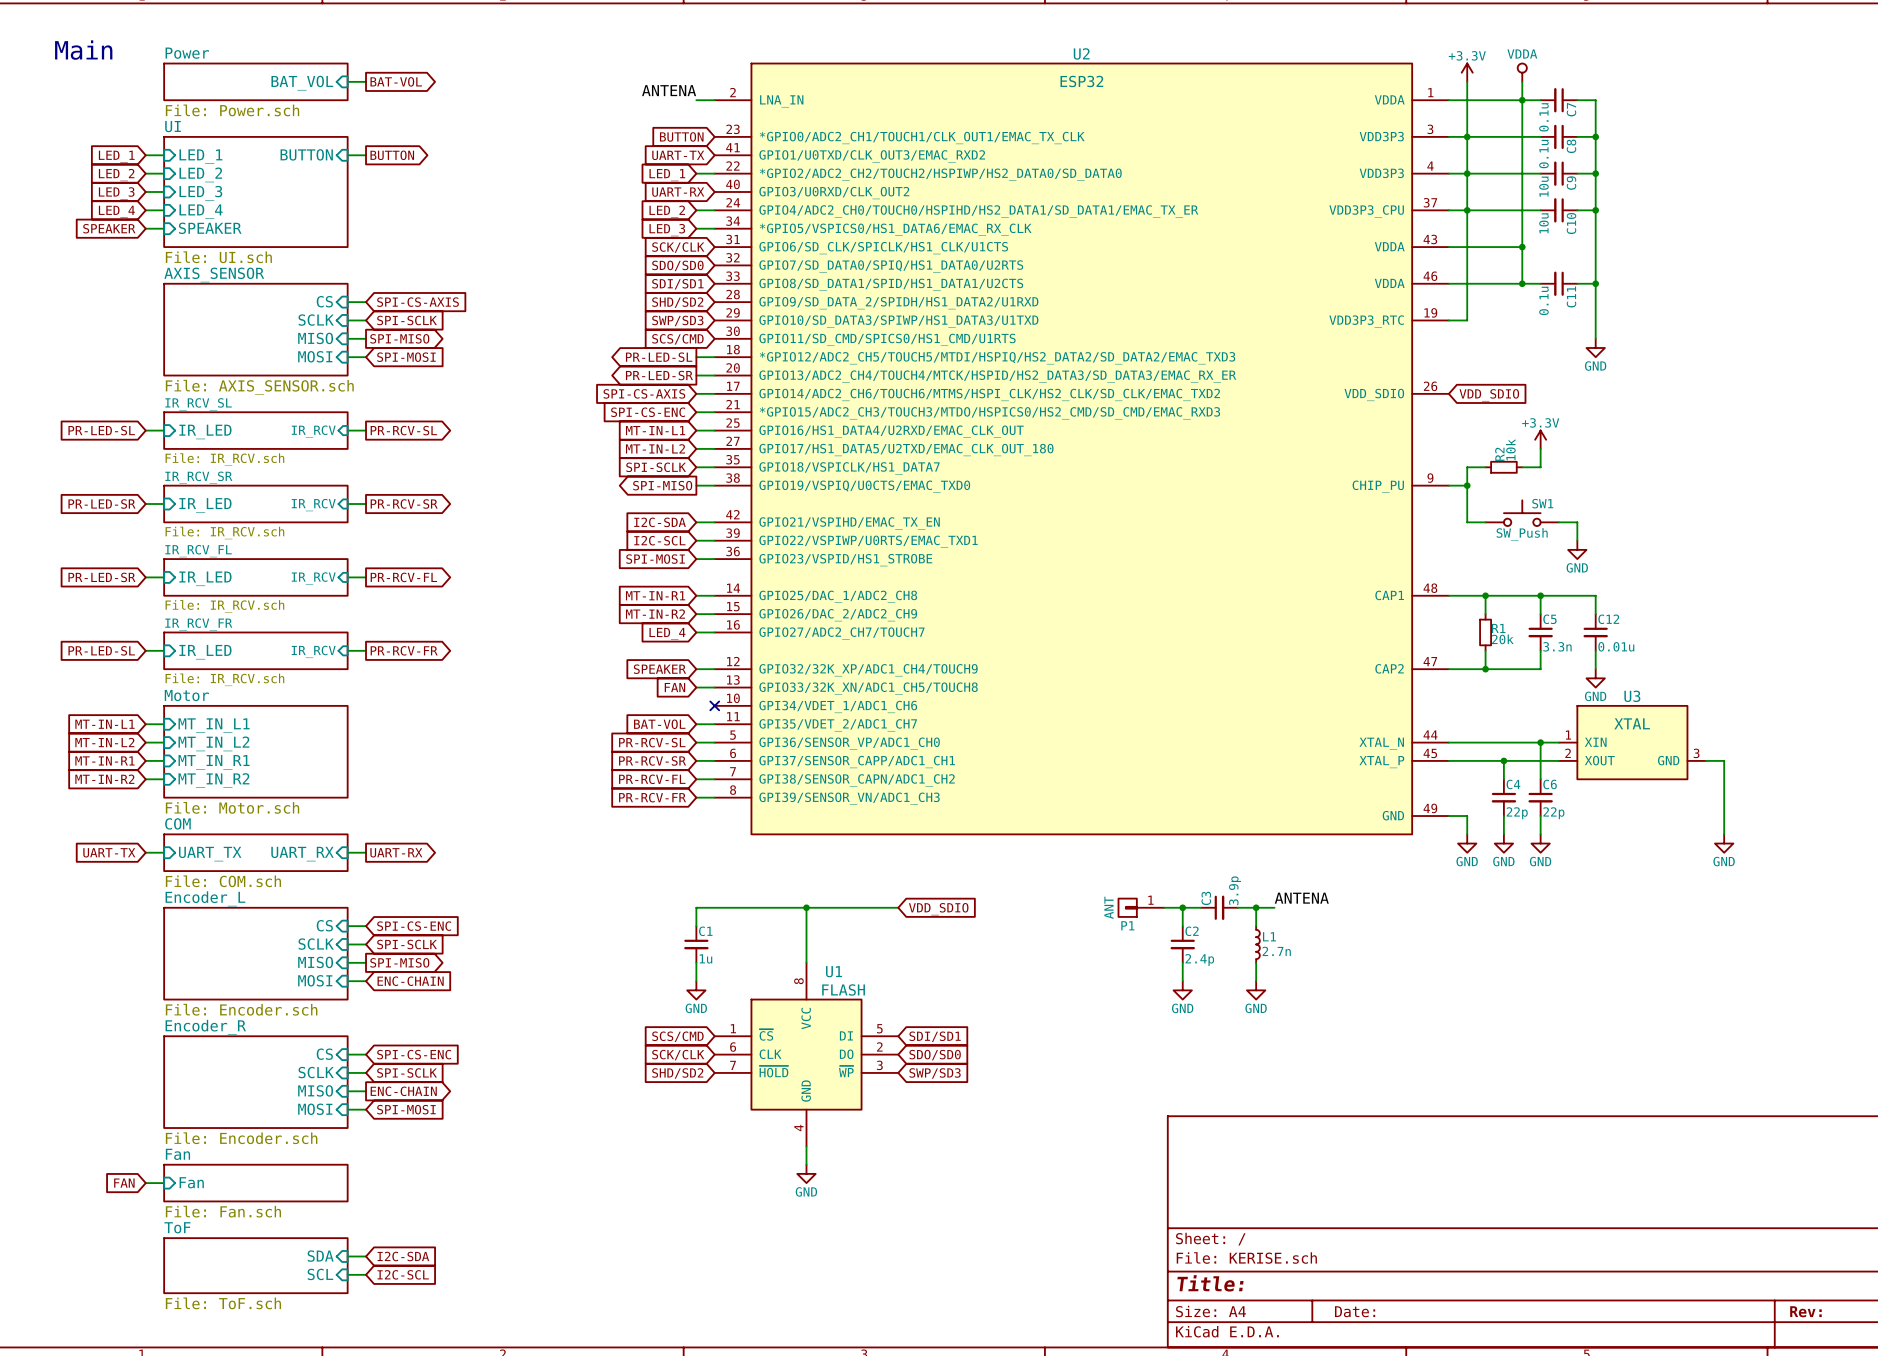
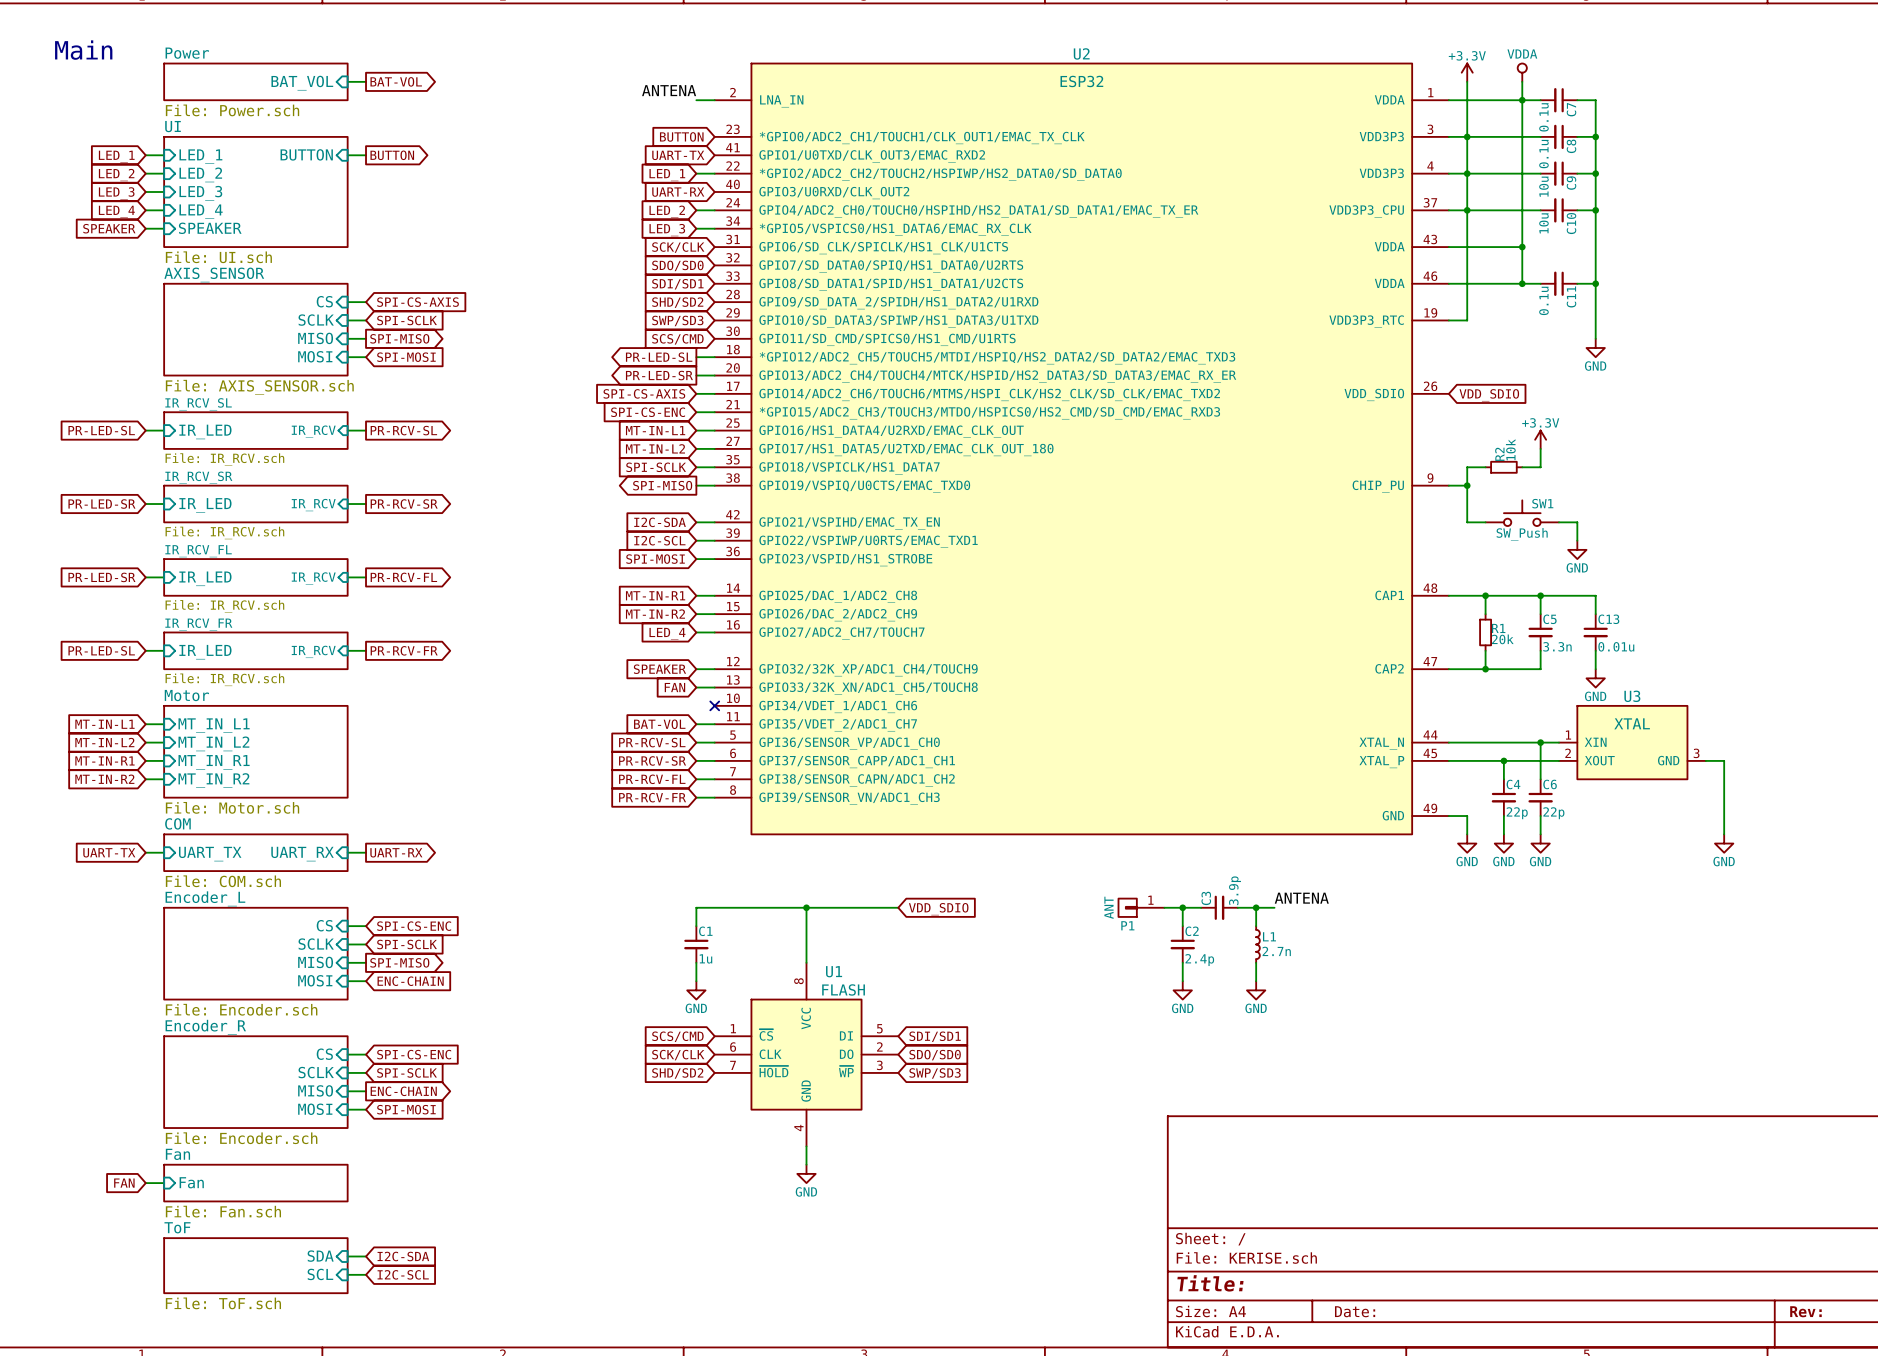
C12 name: C12 (1608, 619) -> C13 (1608, 619)

